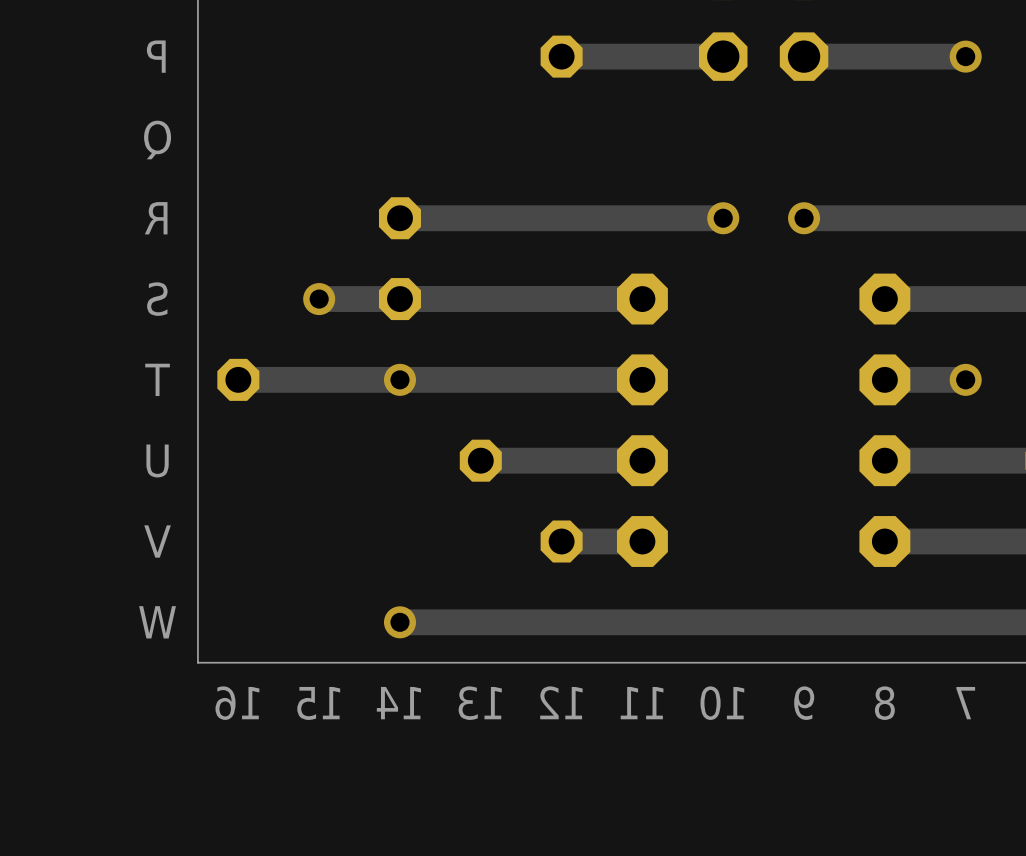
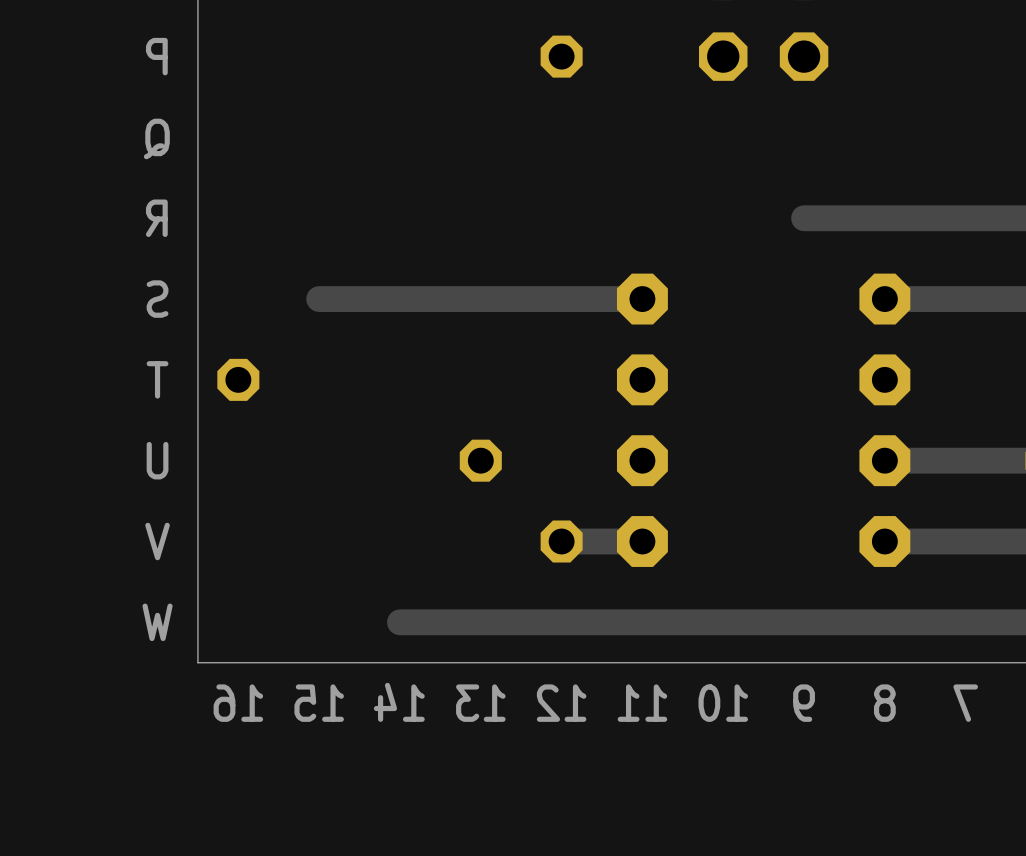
track: (723, 56) (561, 56) -> none
track: (965, 56) (804, 56) -> none
via: (965, 56) -> none
track: (723, 218) (399, 218) -> none
via: (723, 218) -> none
via: (804, 218) -> none
part: (399, 258) -> none
via: (319, 299) -> none
via: (399, 379) -> none
track: (642, 379) (238, 379) -> none
track: (965, 379) (884, 379) -> none
via: (965, 379) -> none
track: (642, 460) (480, 460) -> none
via: (399, 622) -> none

